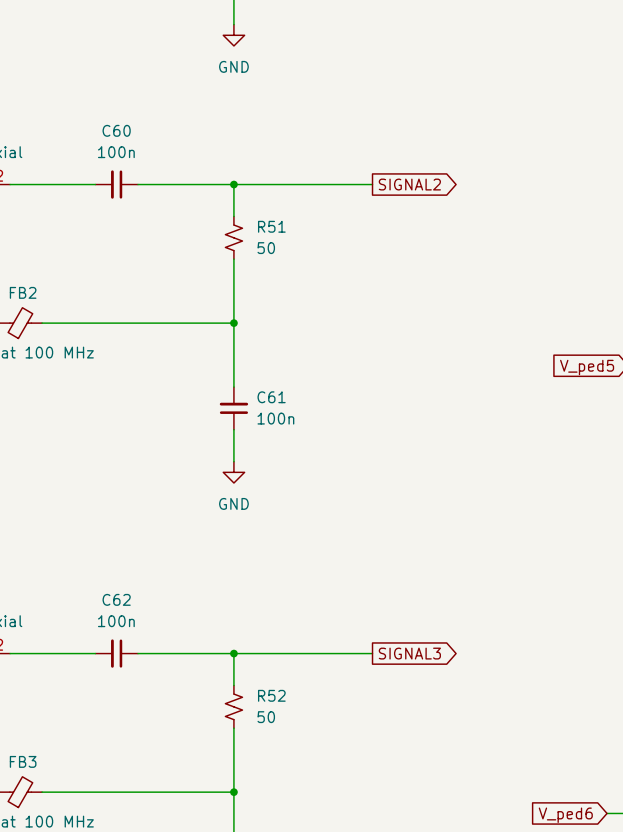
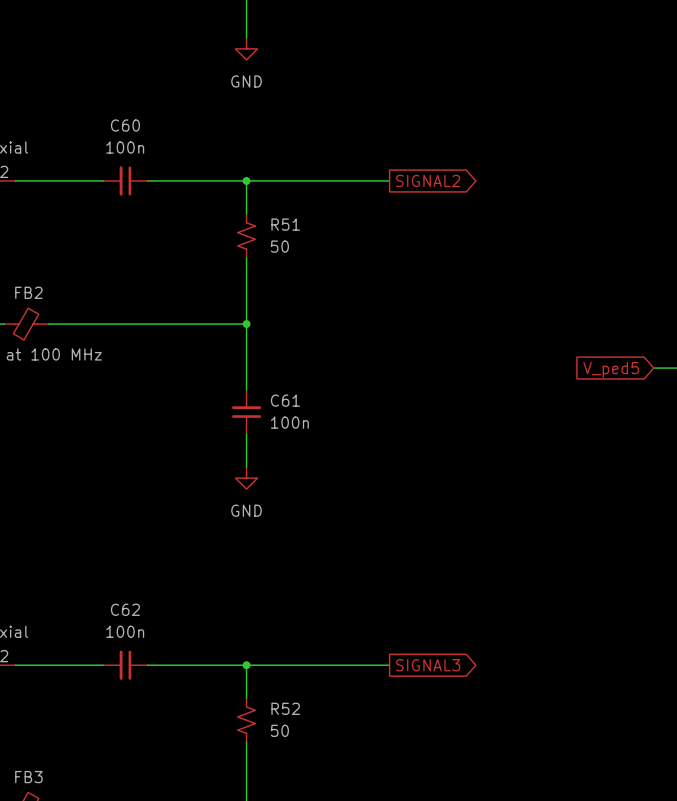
power symbol position: GND (233, 35) -> GND (246, 48)

